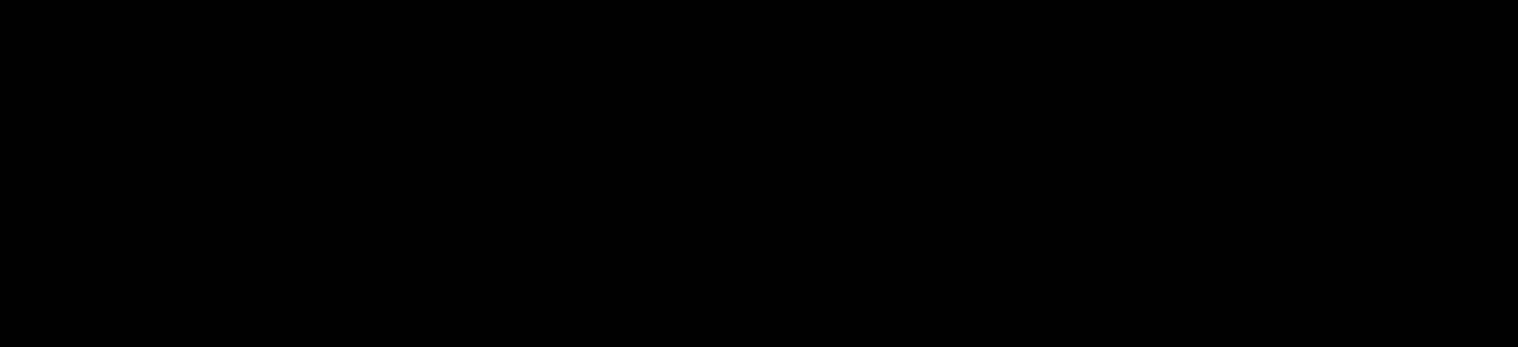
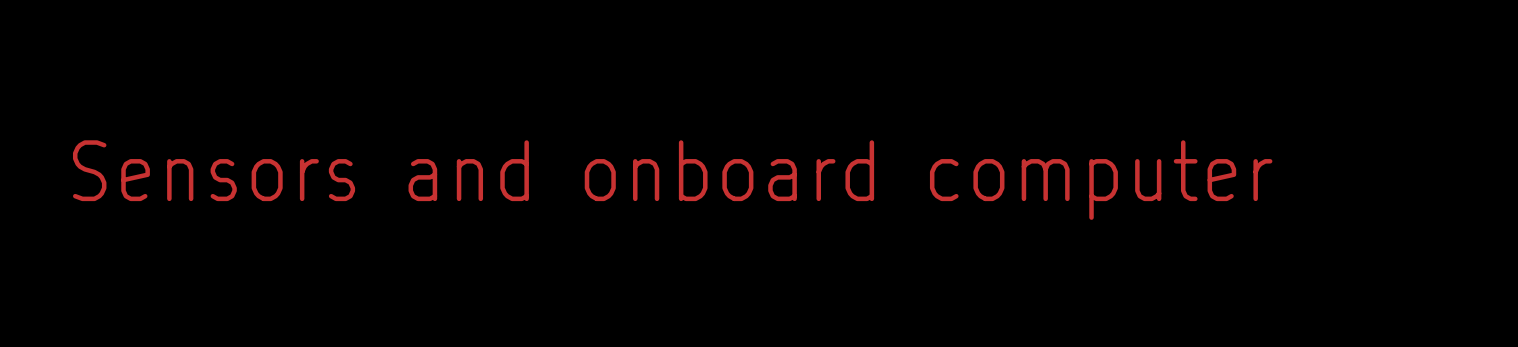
text: none -> Sensors and onboard computer (672, 180)

